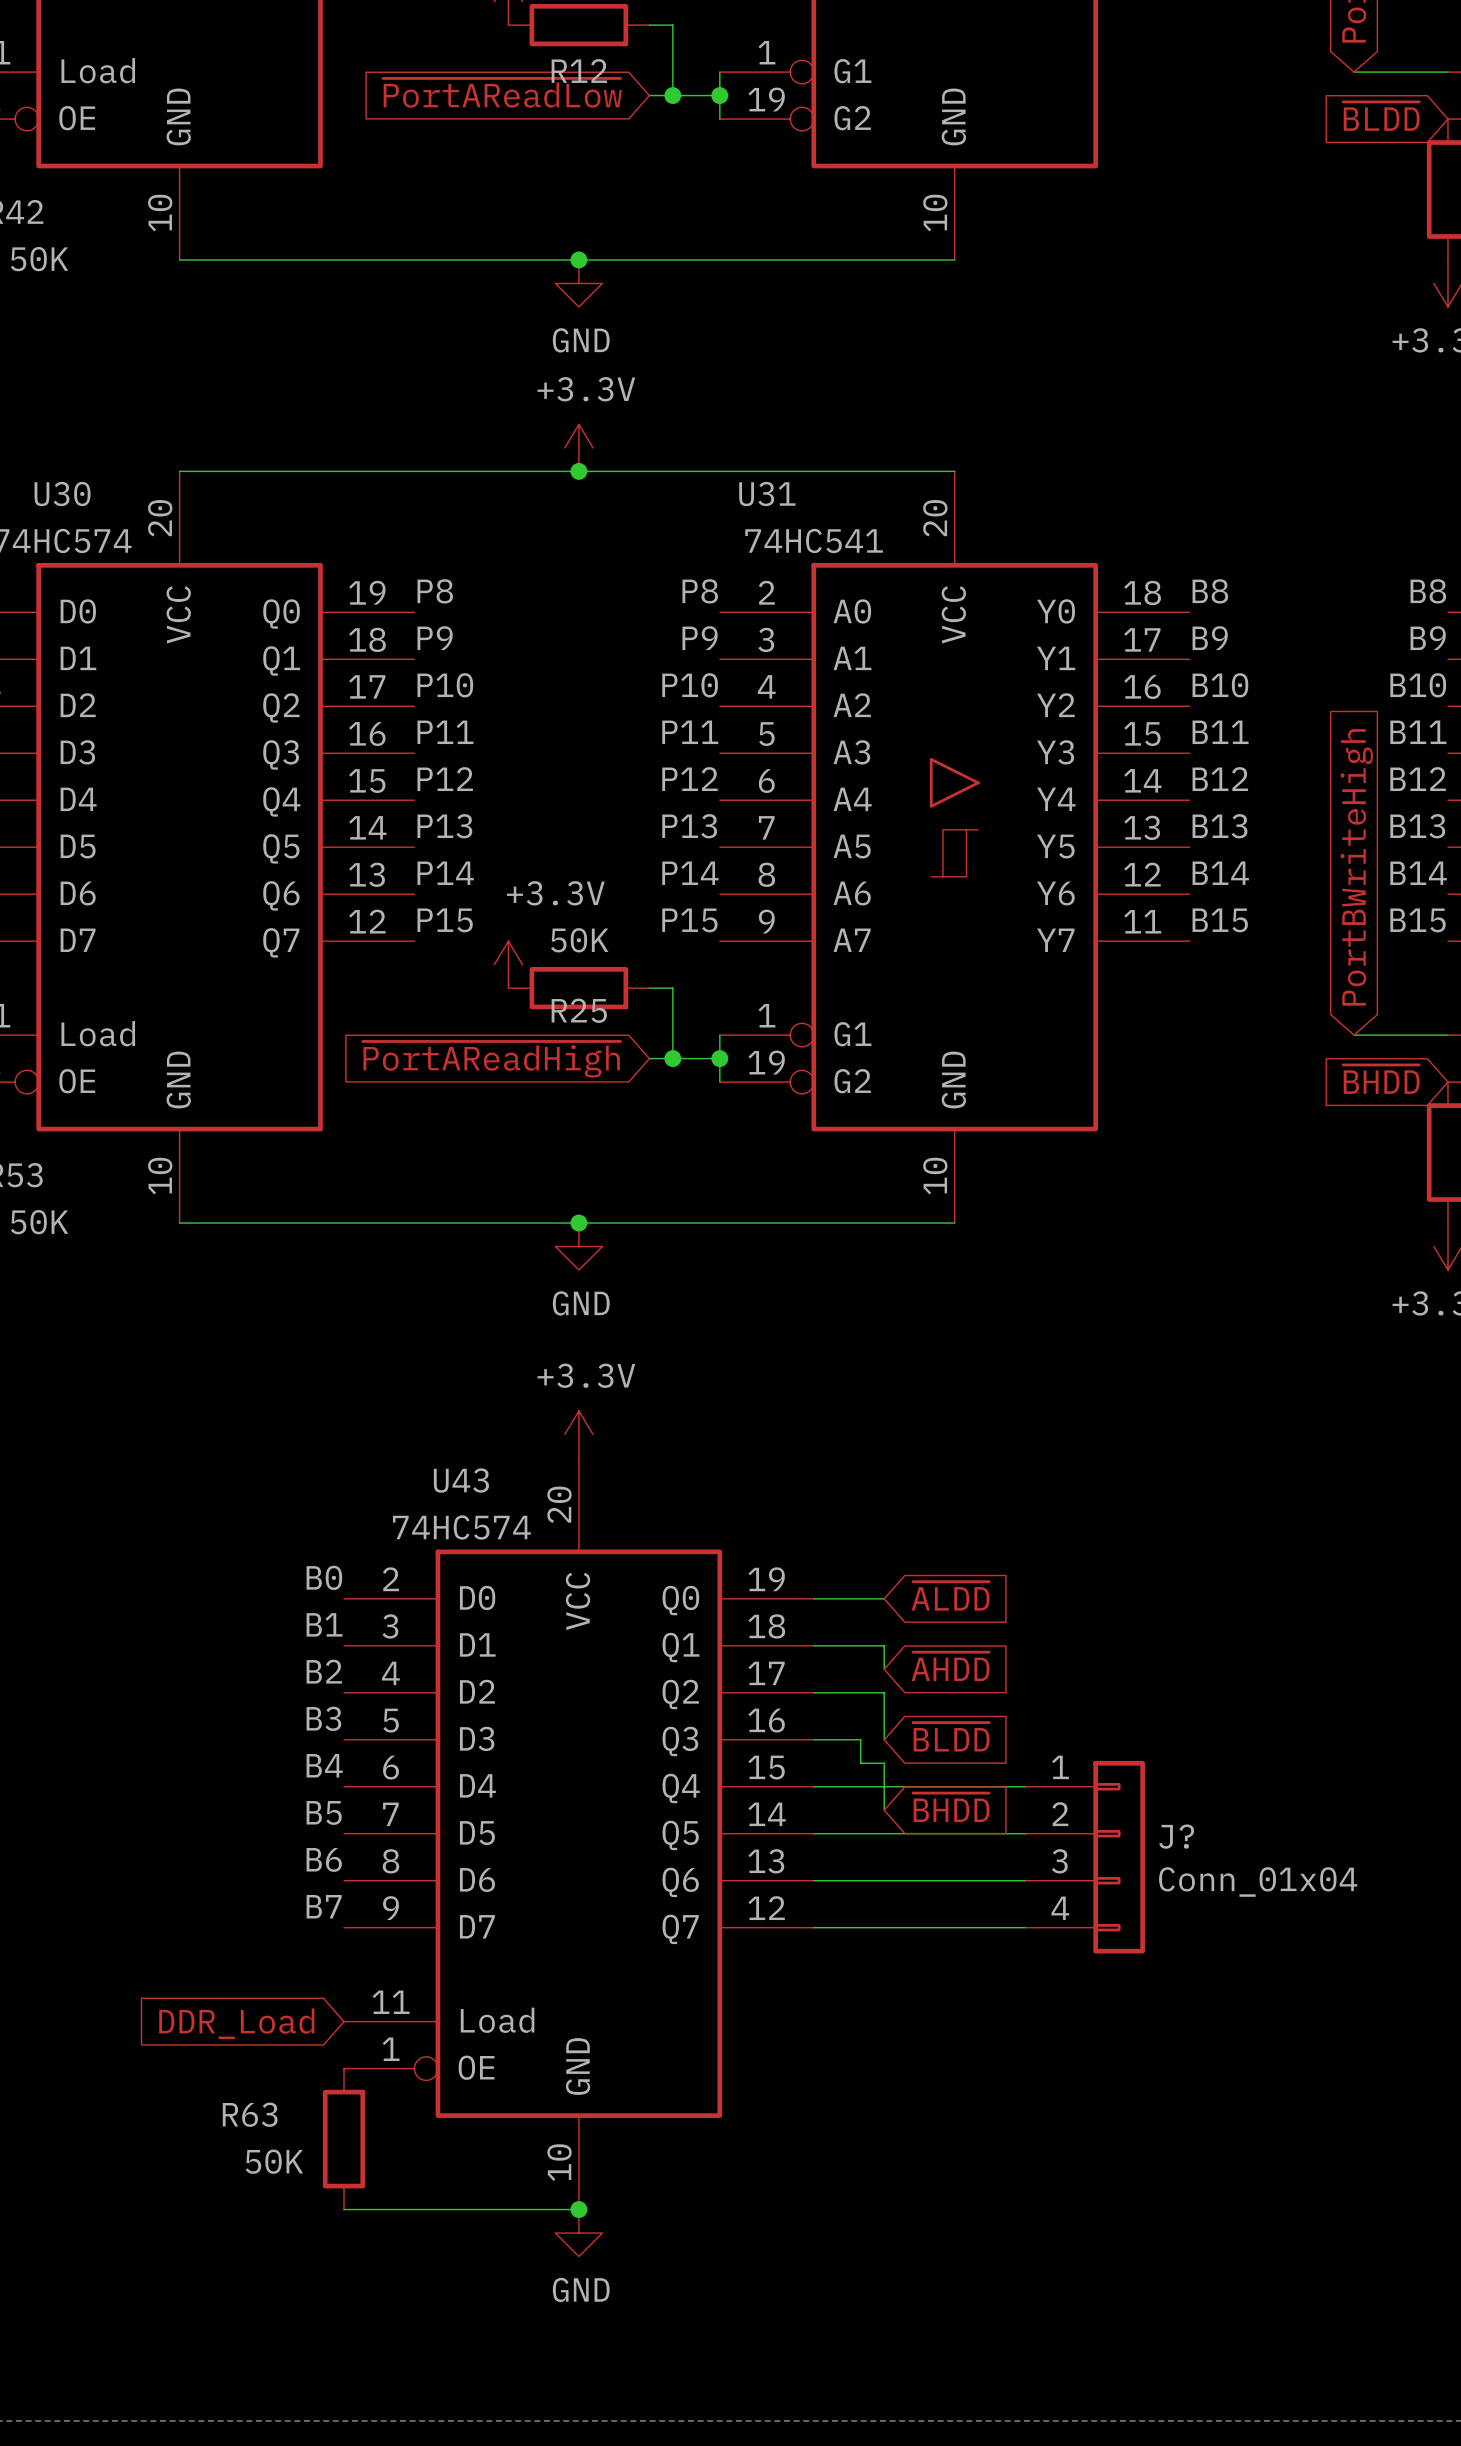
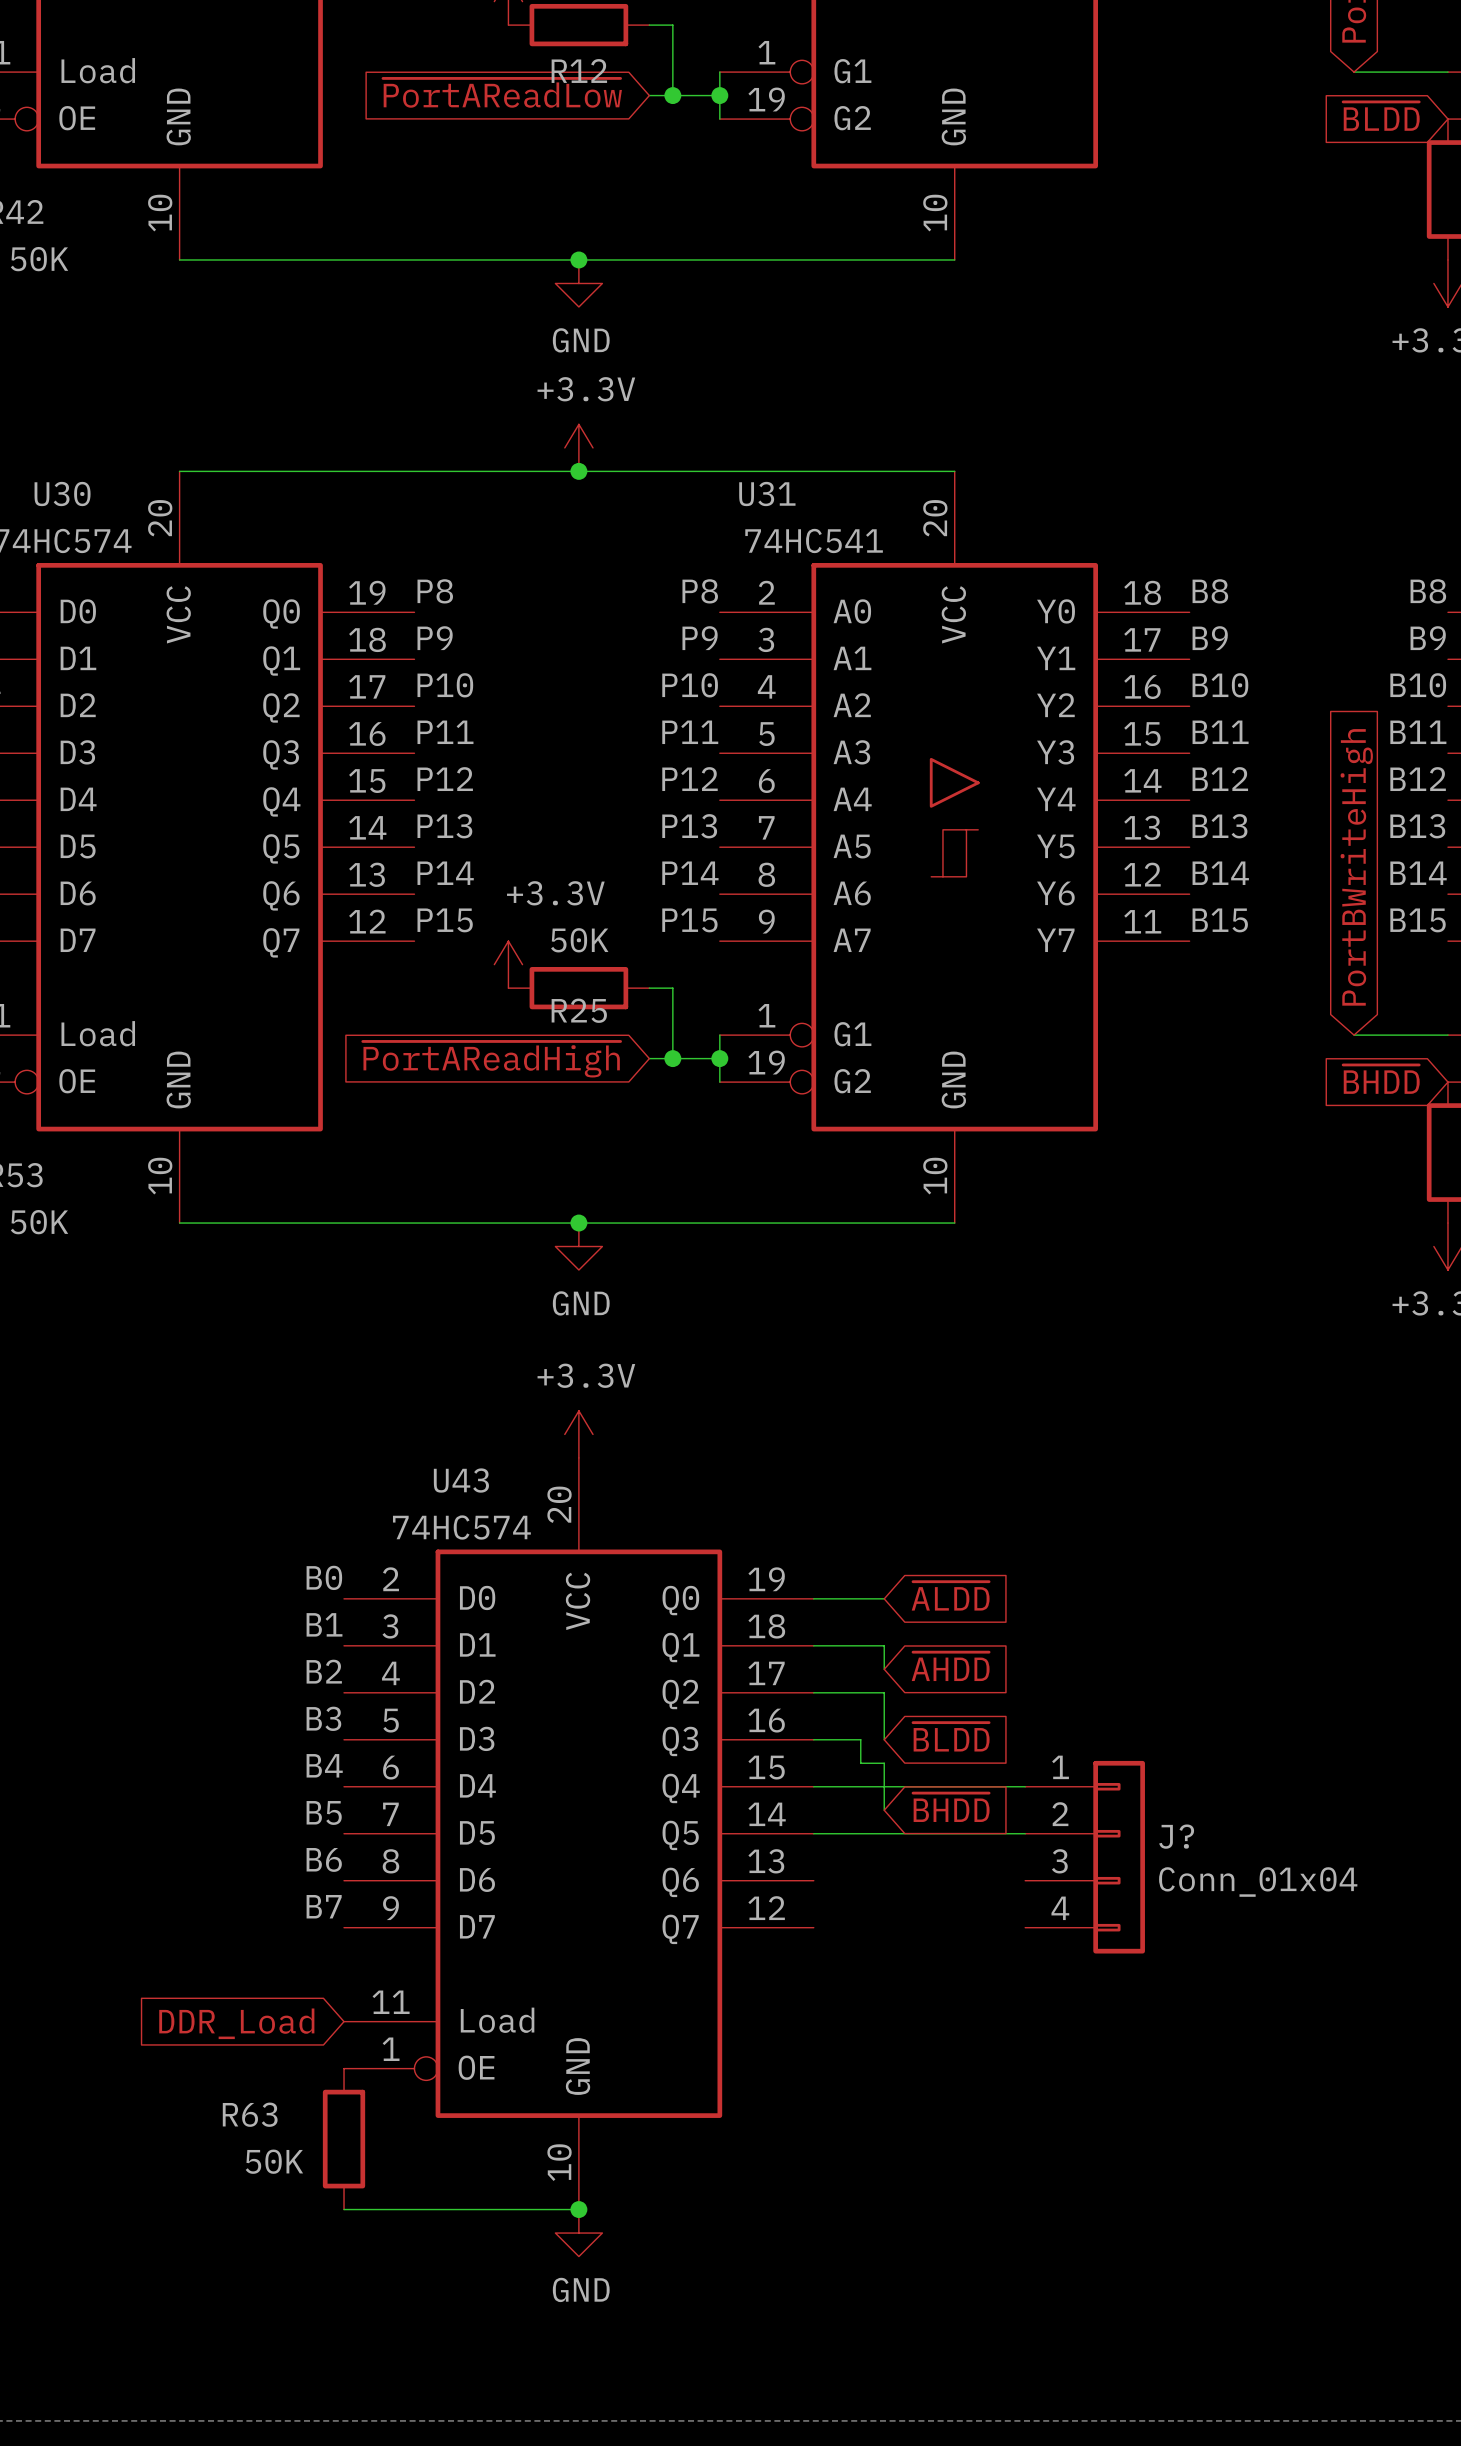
wire: (813, 1880) (1025, 1880) -> none
wire: (813, 1927) (1025, 1927) -> none

